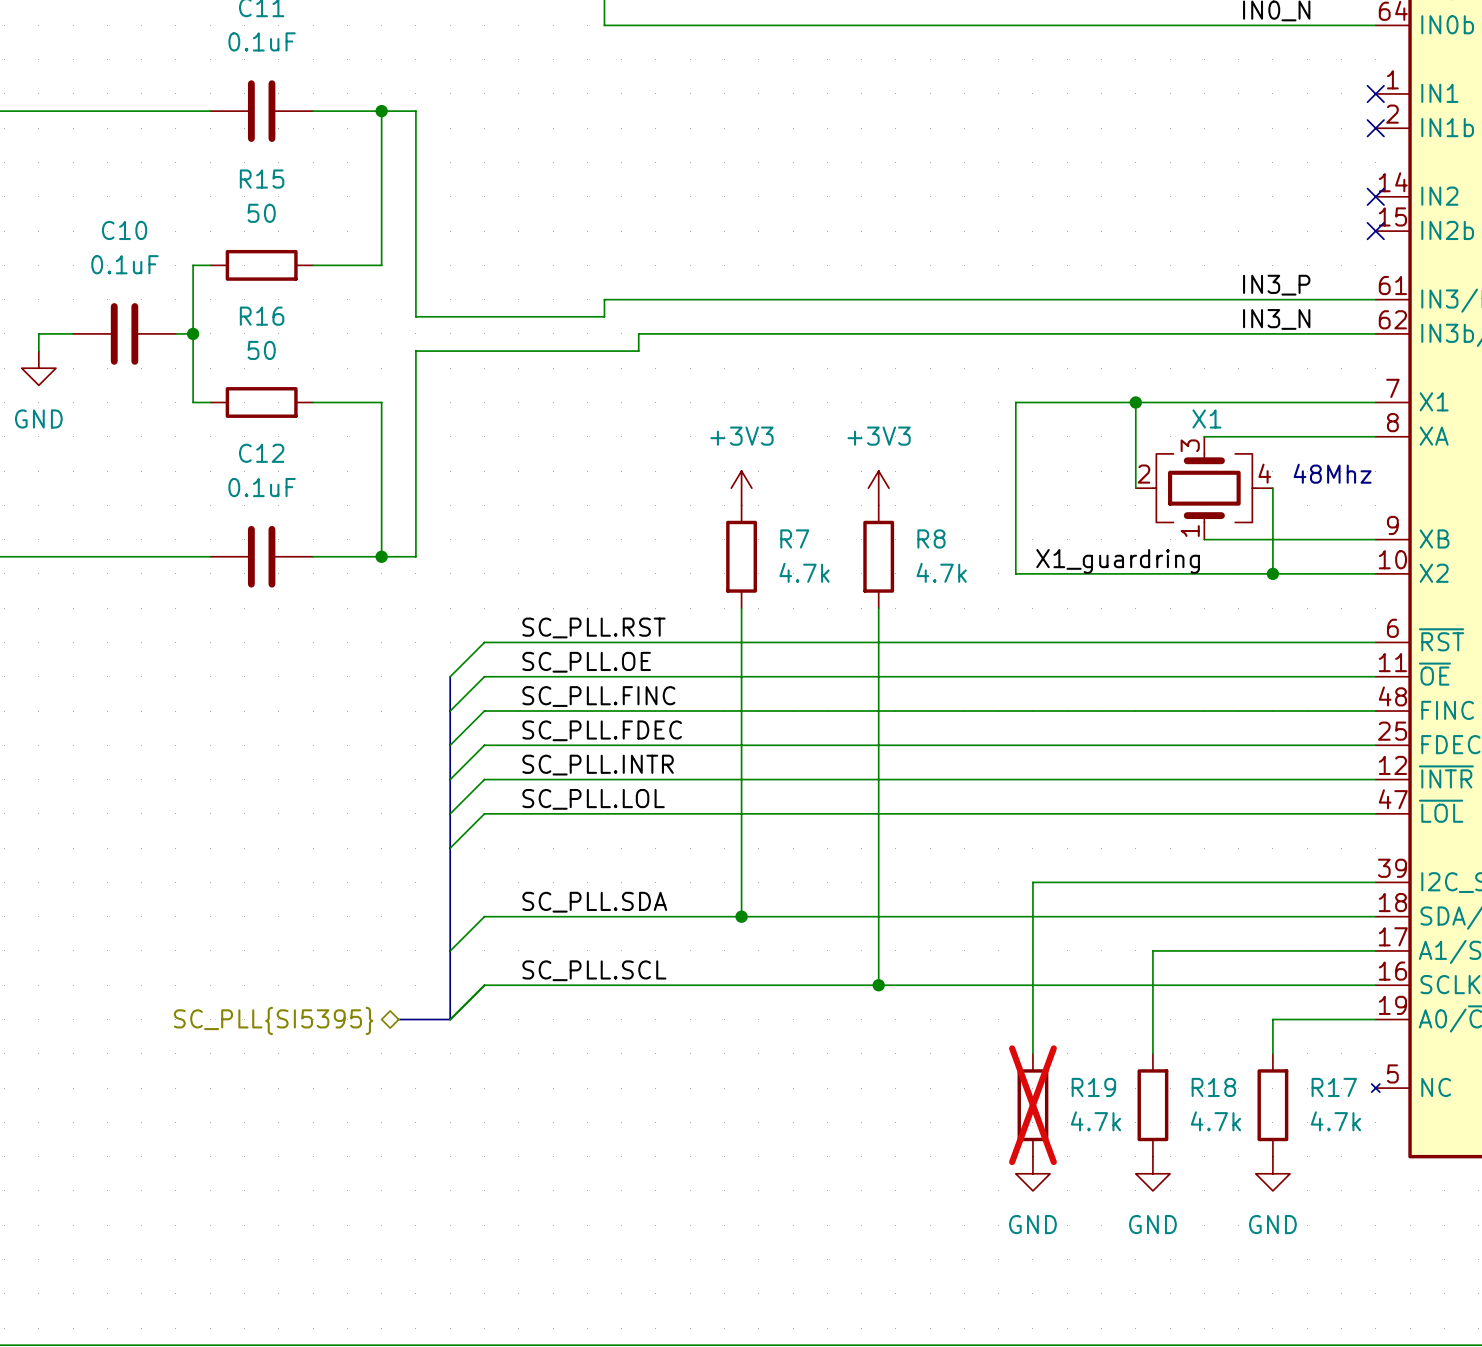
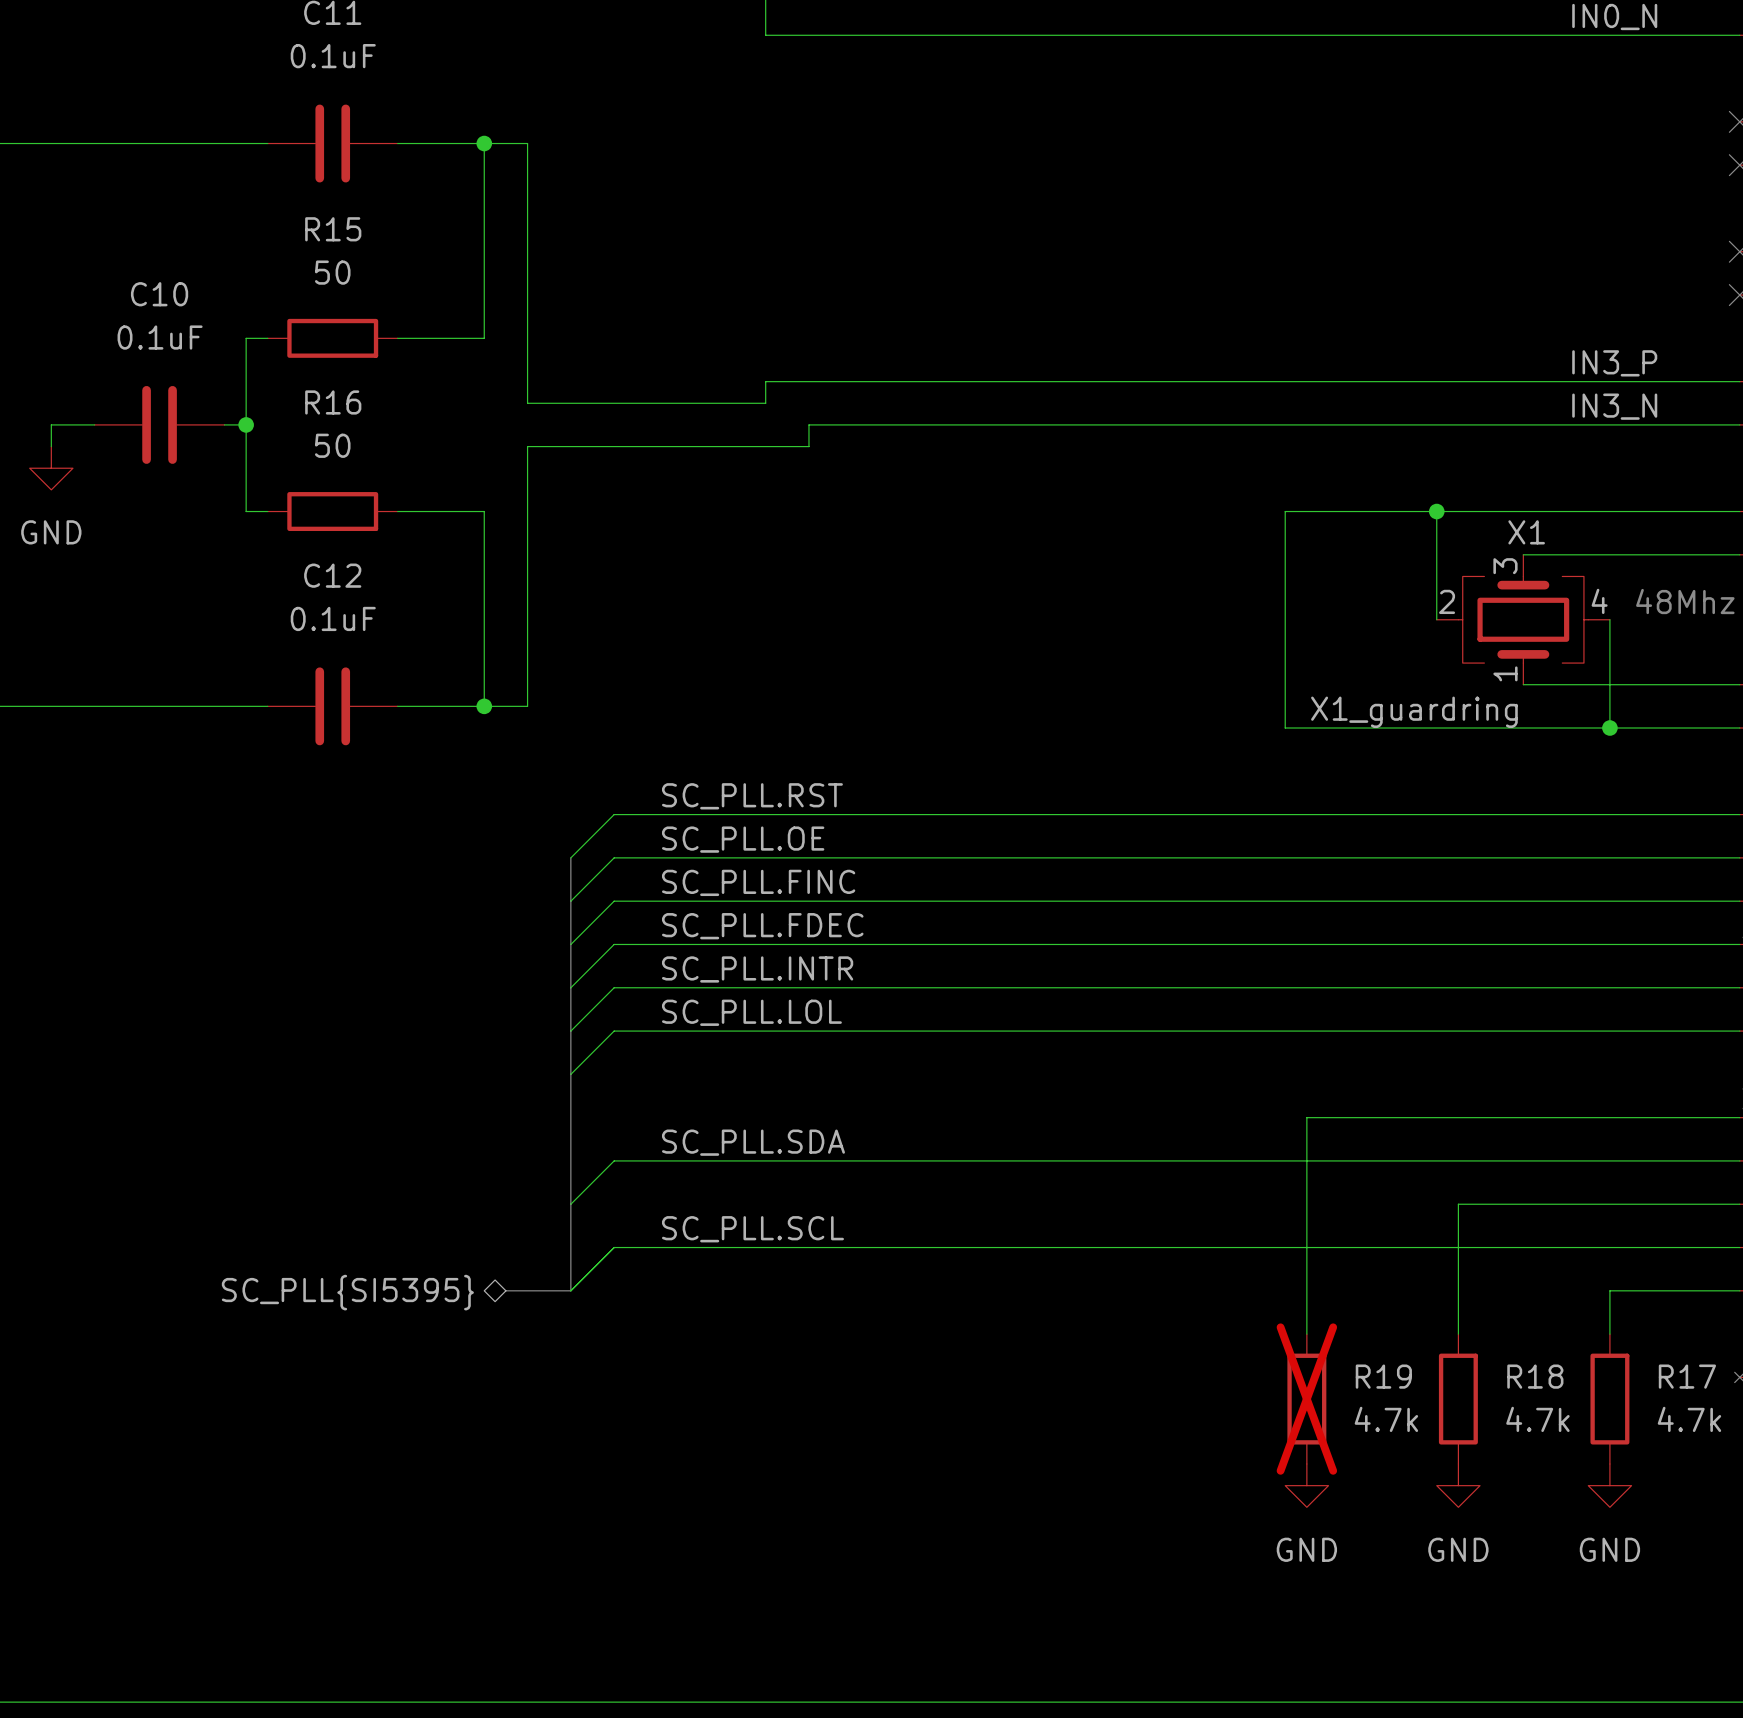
power symbol: +3V3 (741, 488) -> none
power symbol: +3V3 (878, 488) -> none
R7: 4.7k (741, 556) -> none
R8: 4.7k (878, 556) -> none
wire: (741, 608) (741, 916) -> none
wire: (878, 608) (878, 985) -> none
junction: (741, 916) -> none
junction: (878, 985) -> none

